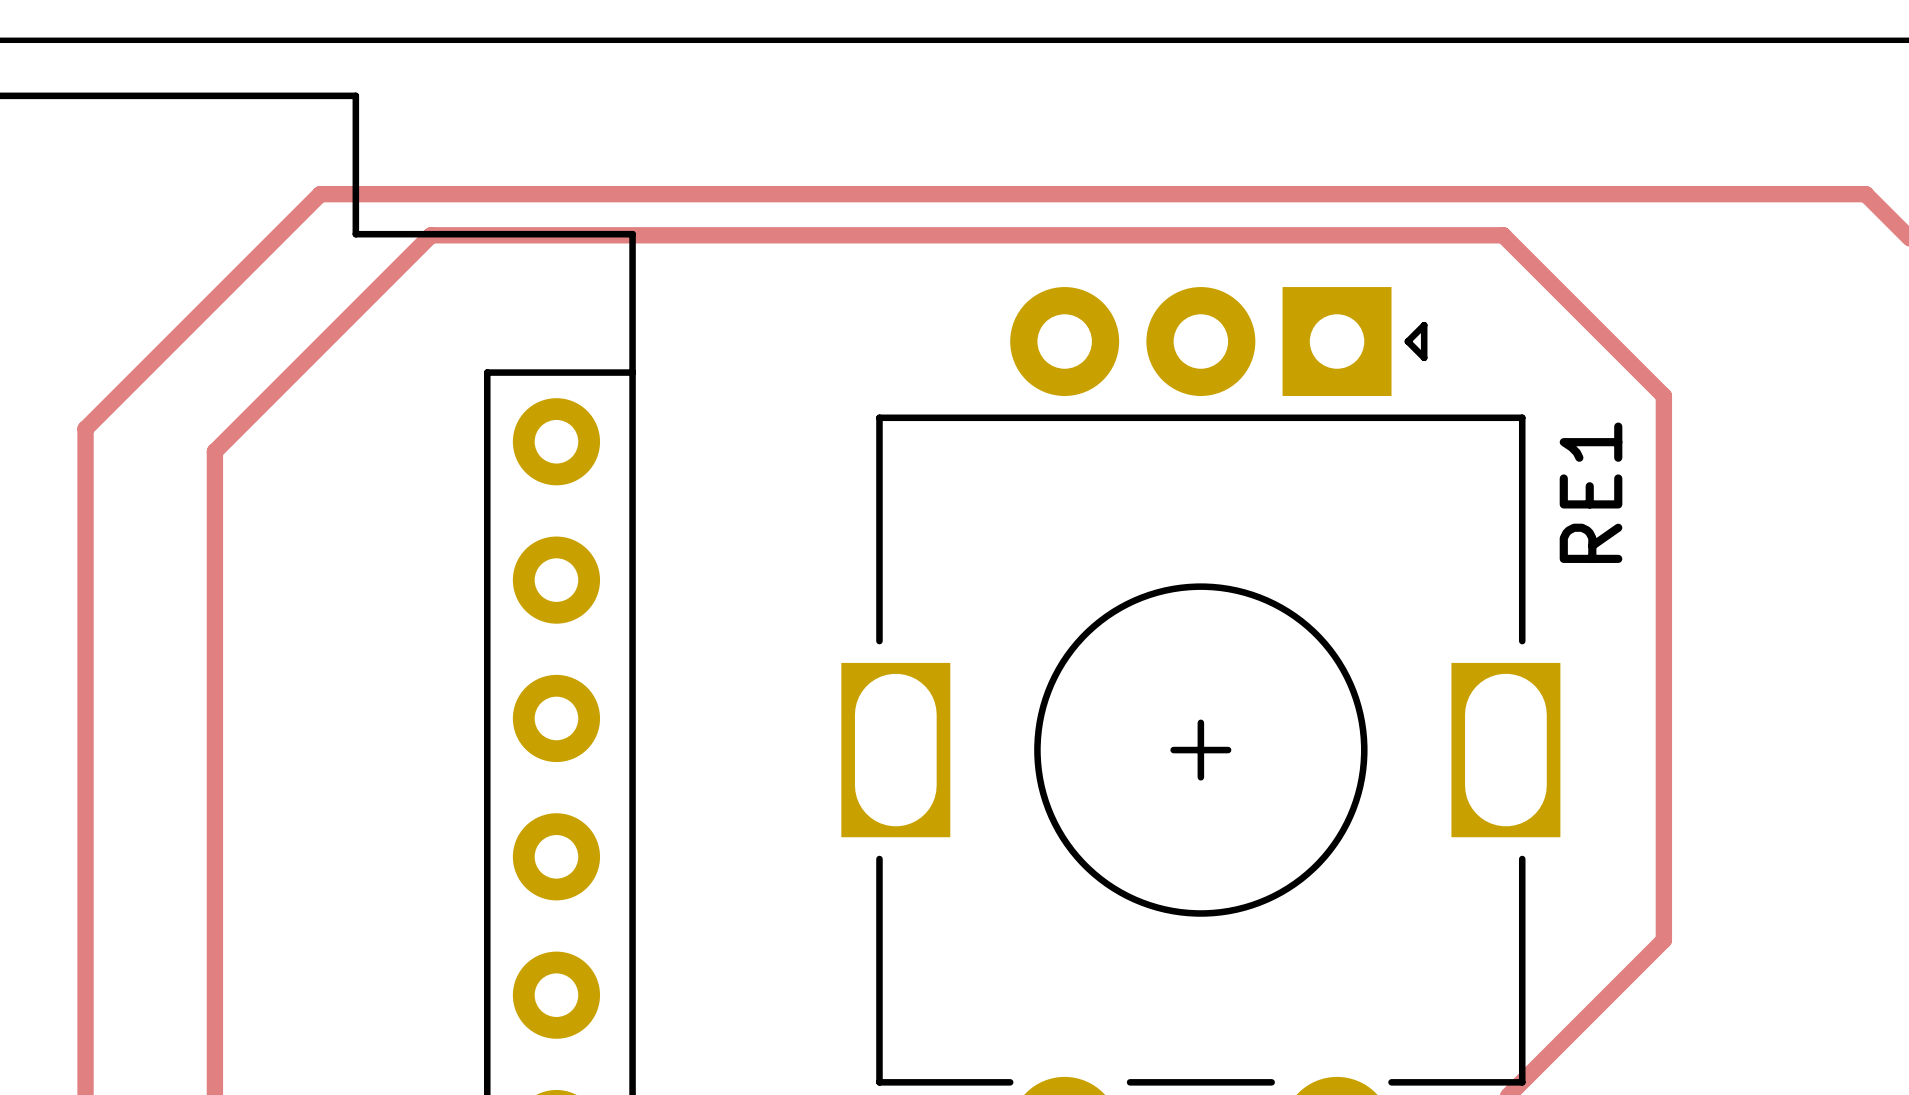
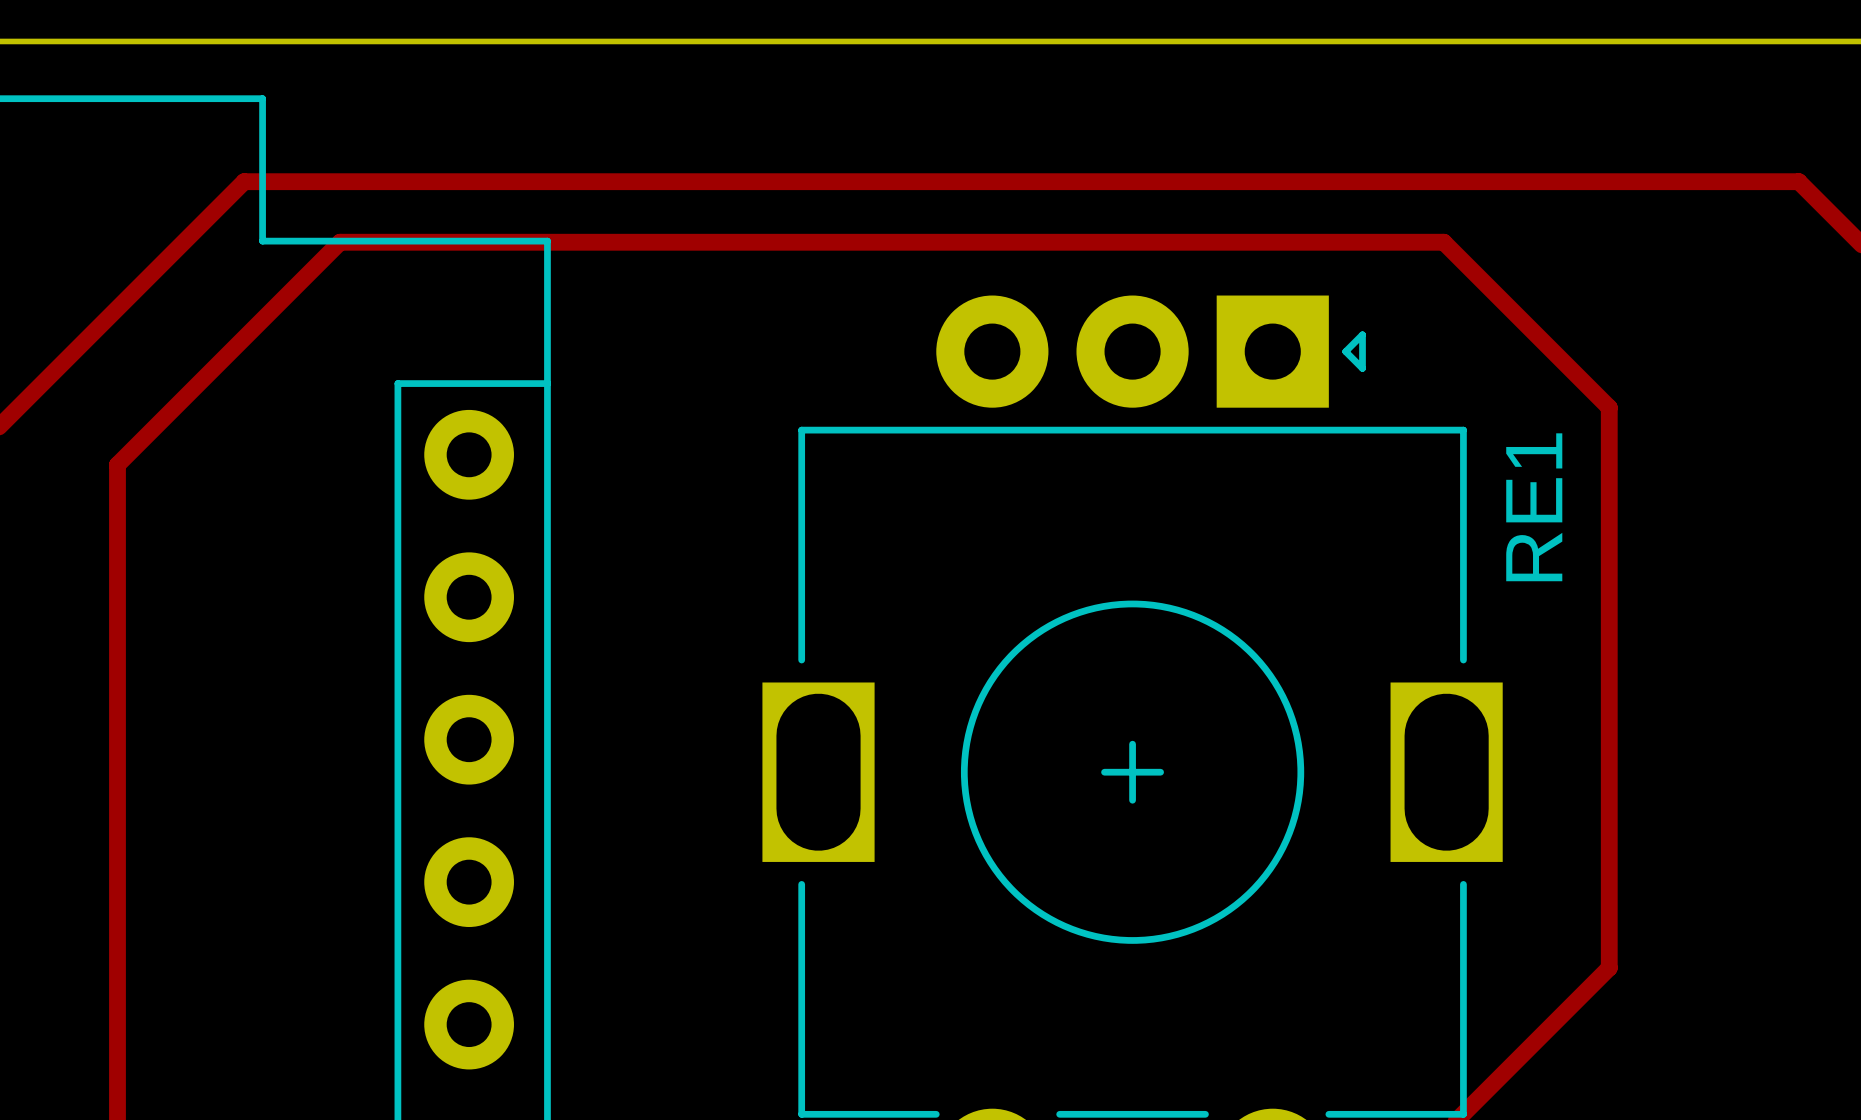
track: (320, 194) (1865, 194) -> (226, 199) (244, 181) (1798, 181) (1817, 199)

